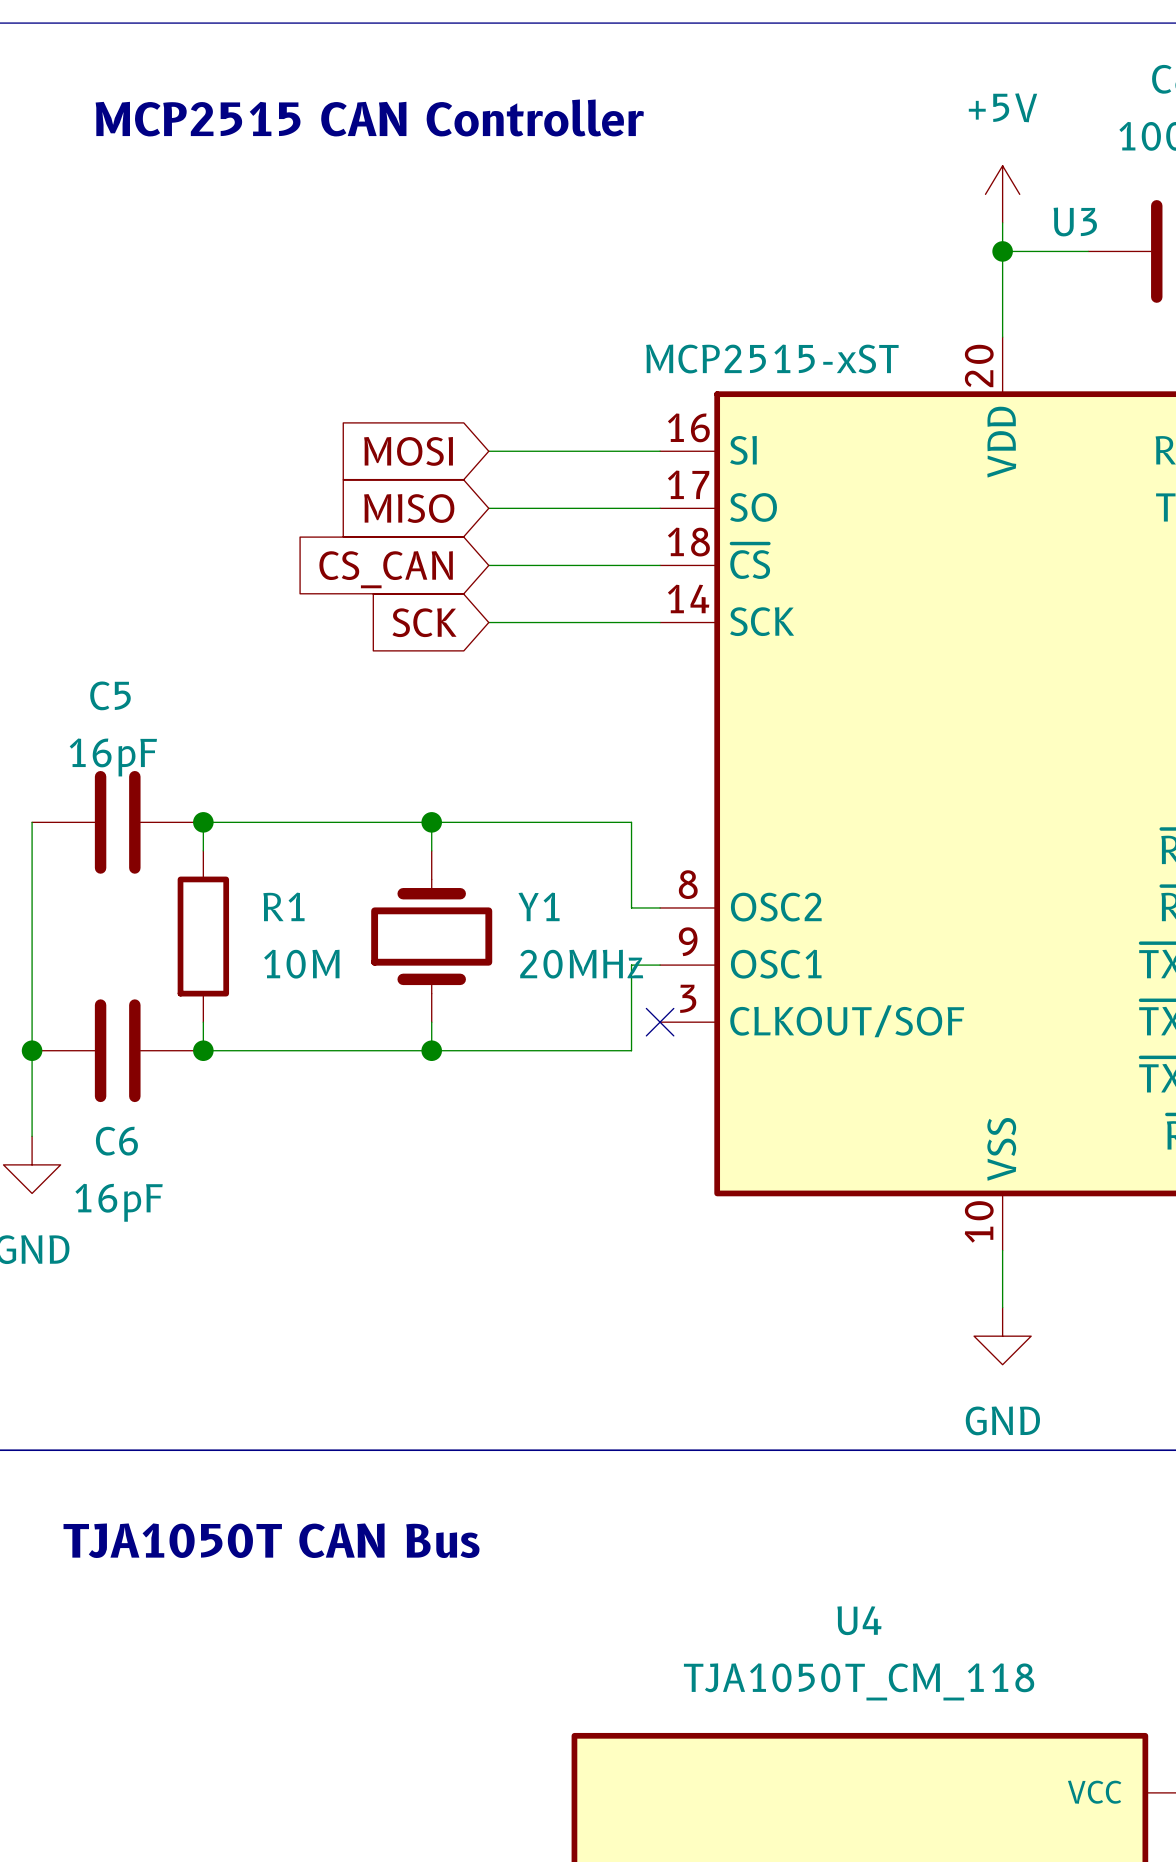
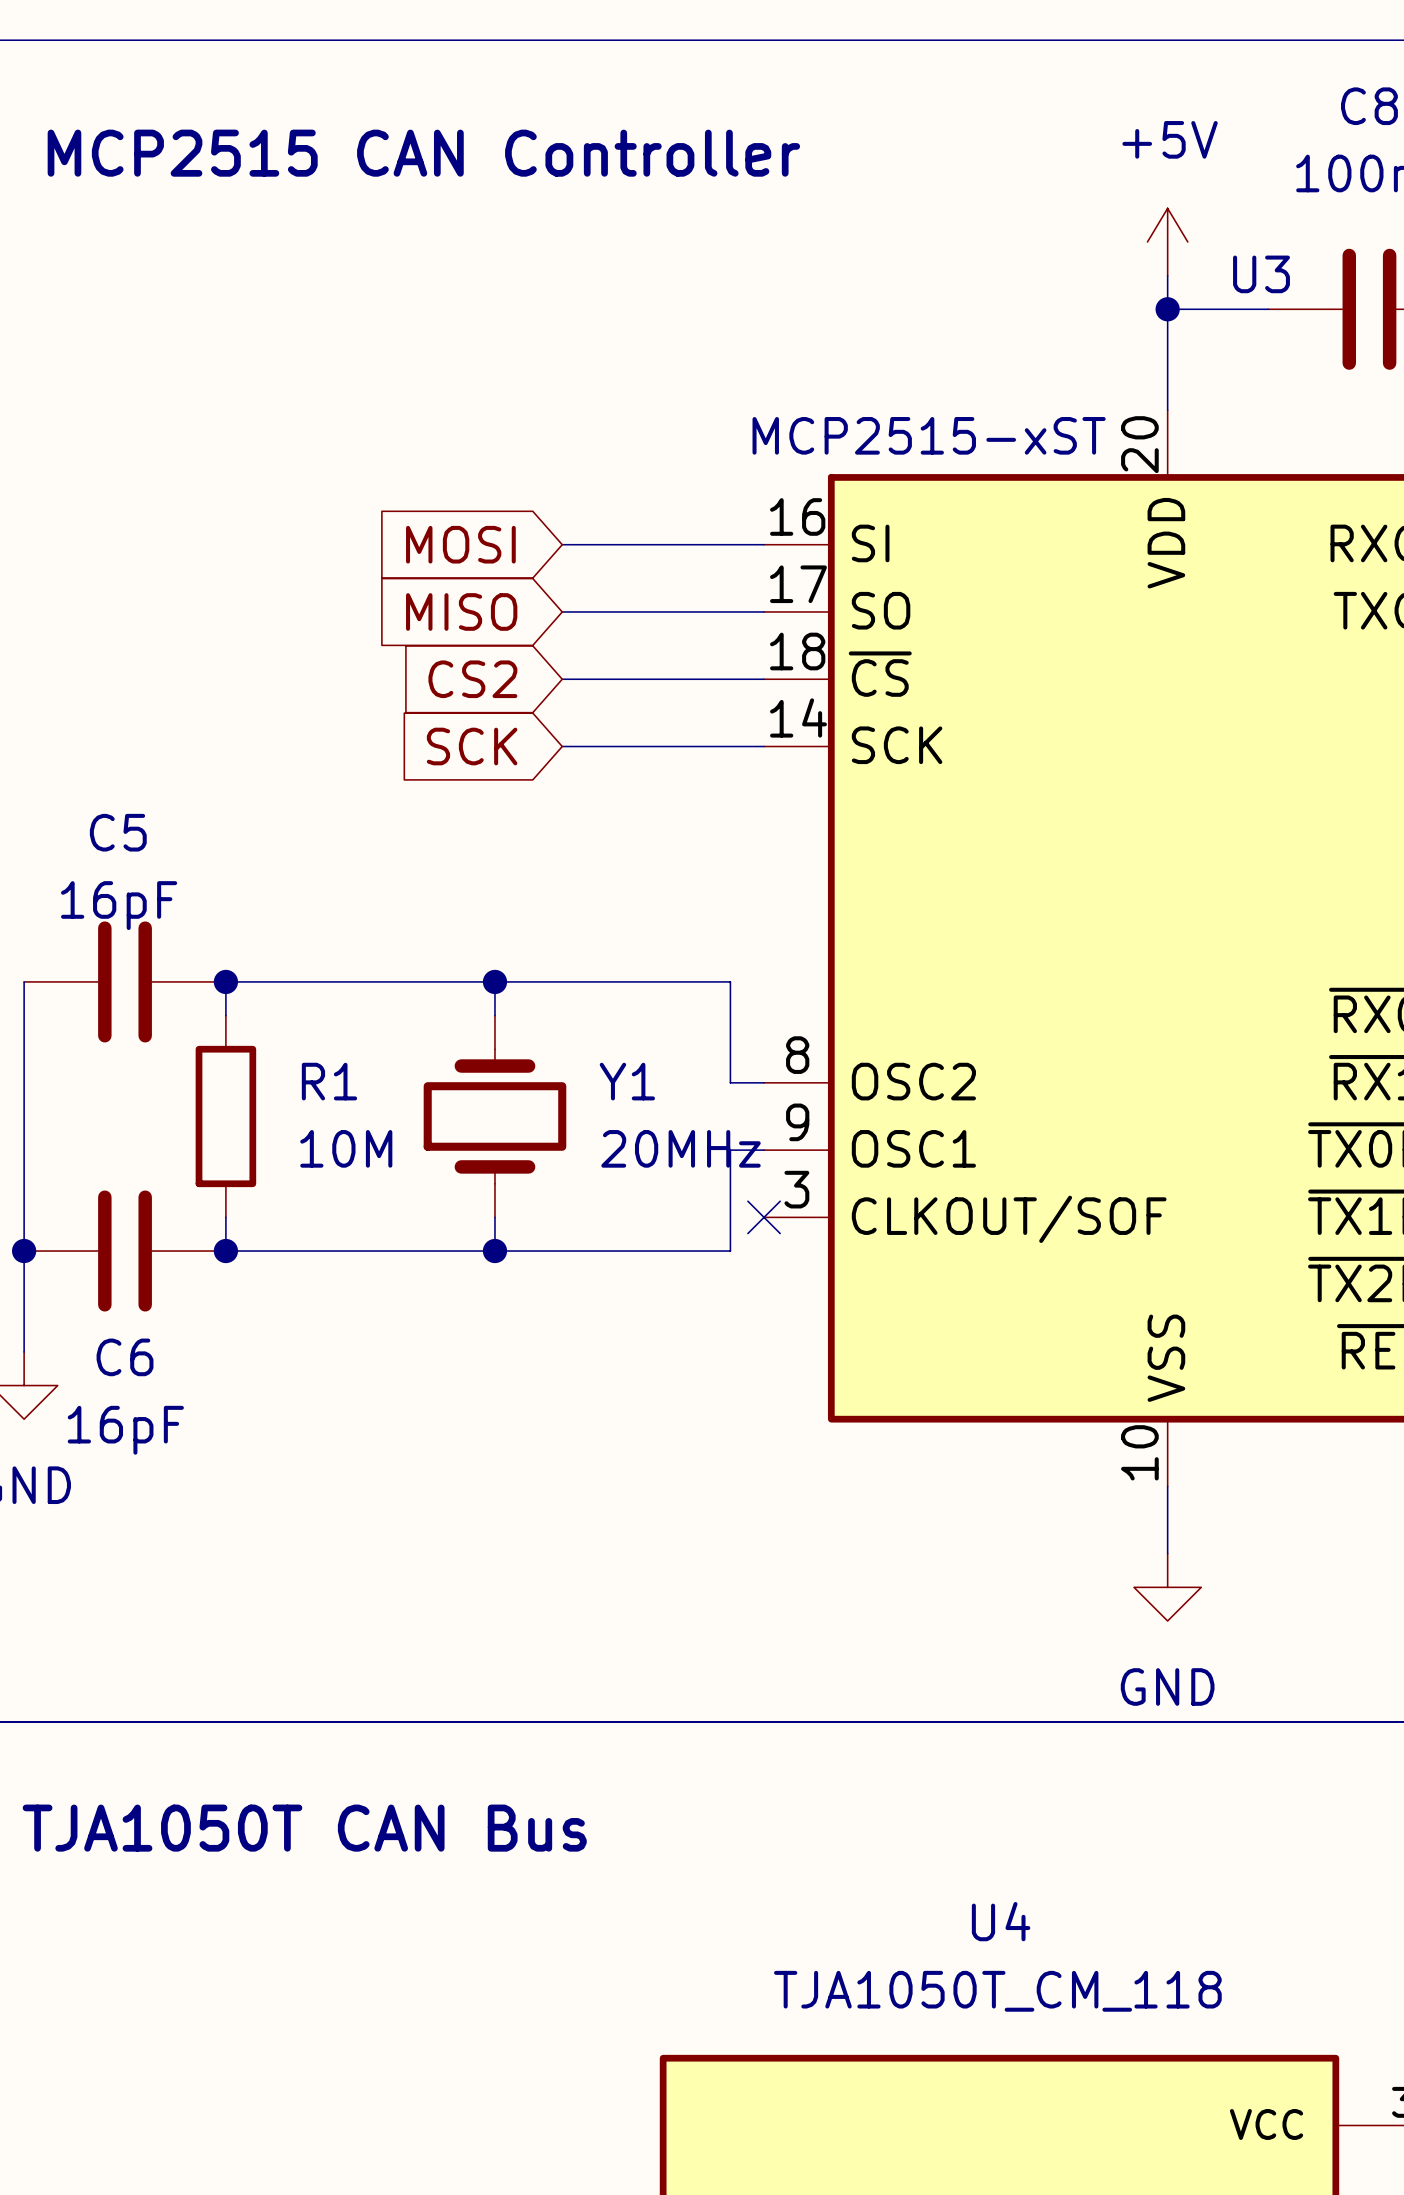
global label: CS_CAN (386, 569) -> CS2 (472, 679)

